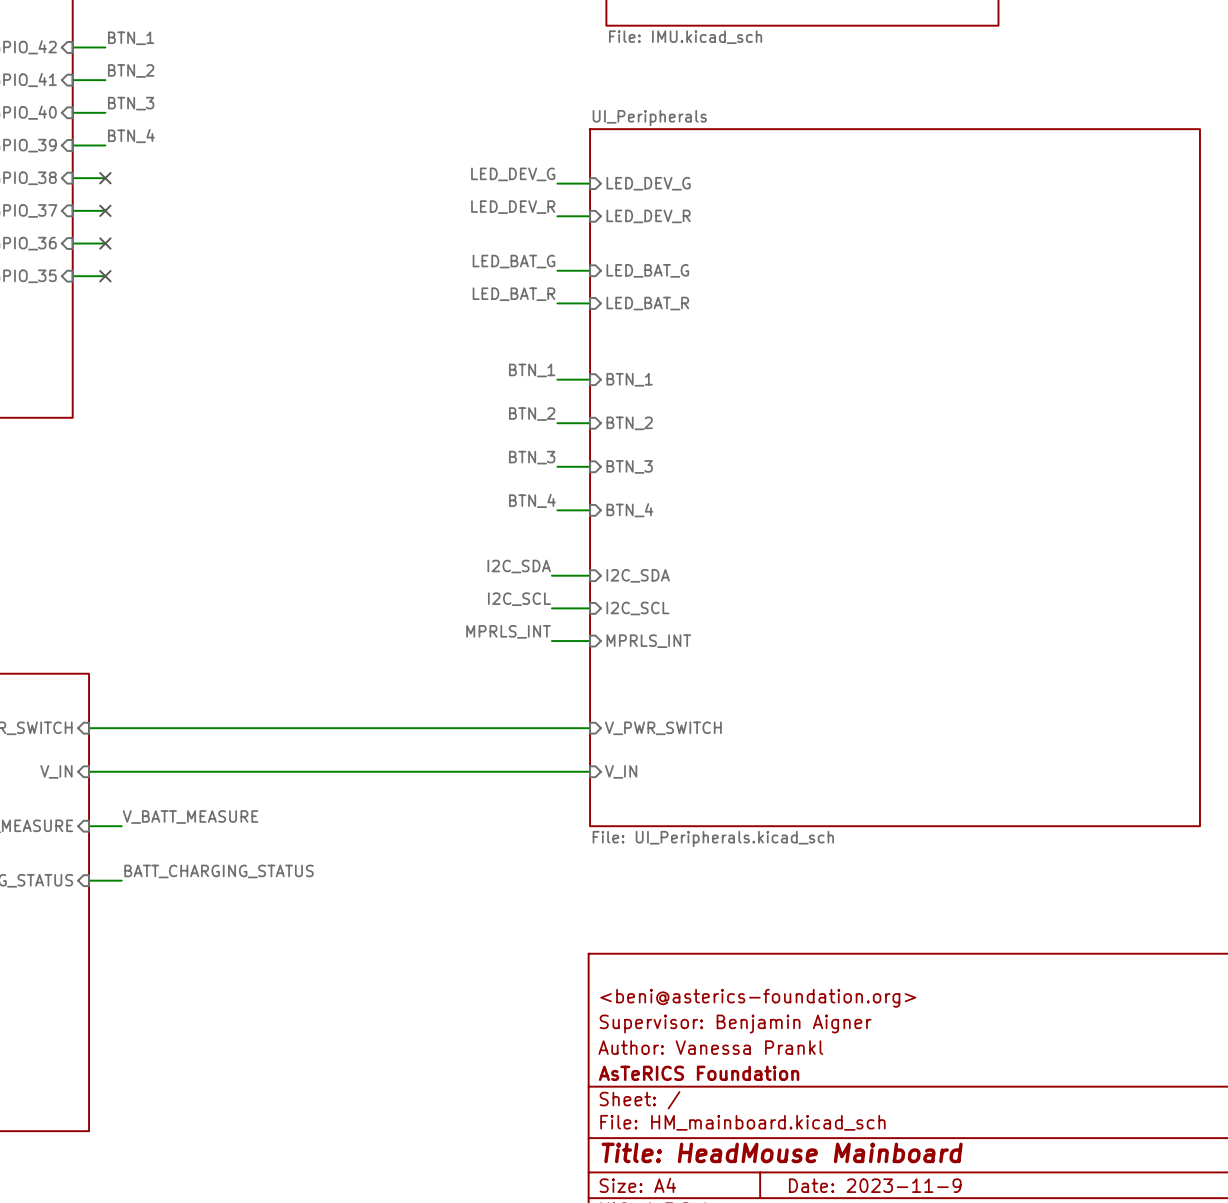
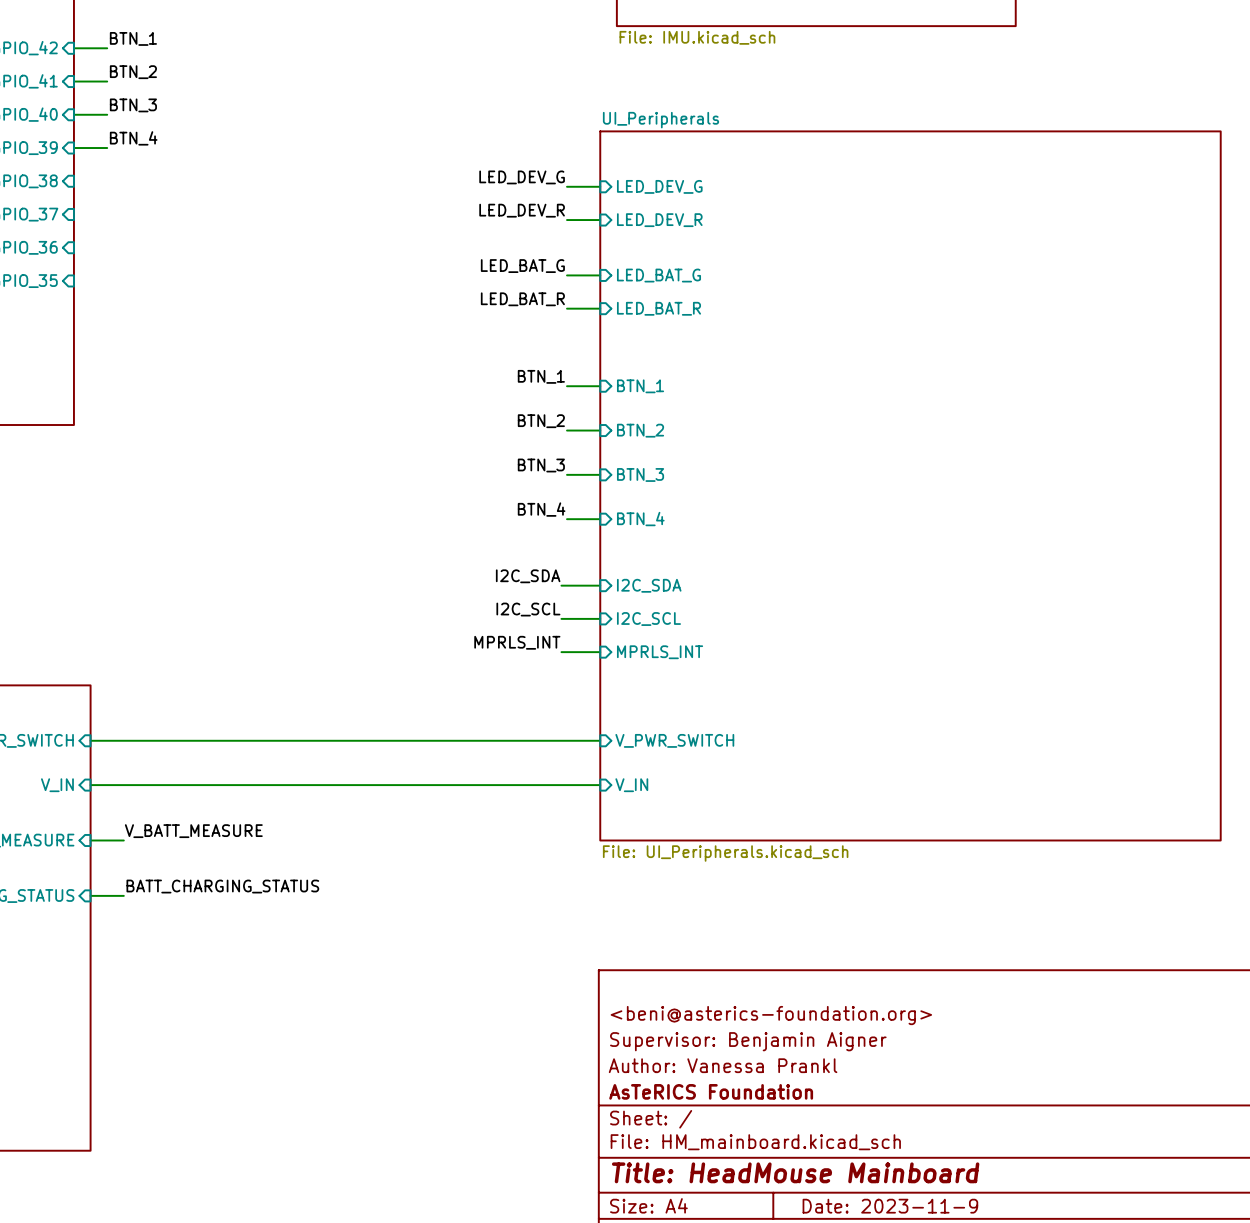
wire: (72, 178) (105, 178) -> none
no-connect mark: (105, 178) -> none
wire: (72, 210) (105, 210) -> none
no-connect mark: (105, 210) -> none
wire: (72, 243) (105, 243) -> none
no-connect mark: (105, 243) -> none
wire: (72, 276) (105, 276) -> none
no-connect mark: (105, 276) -> none

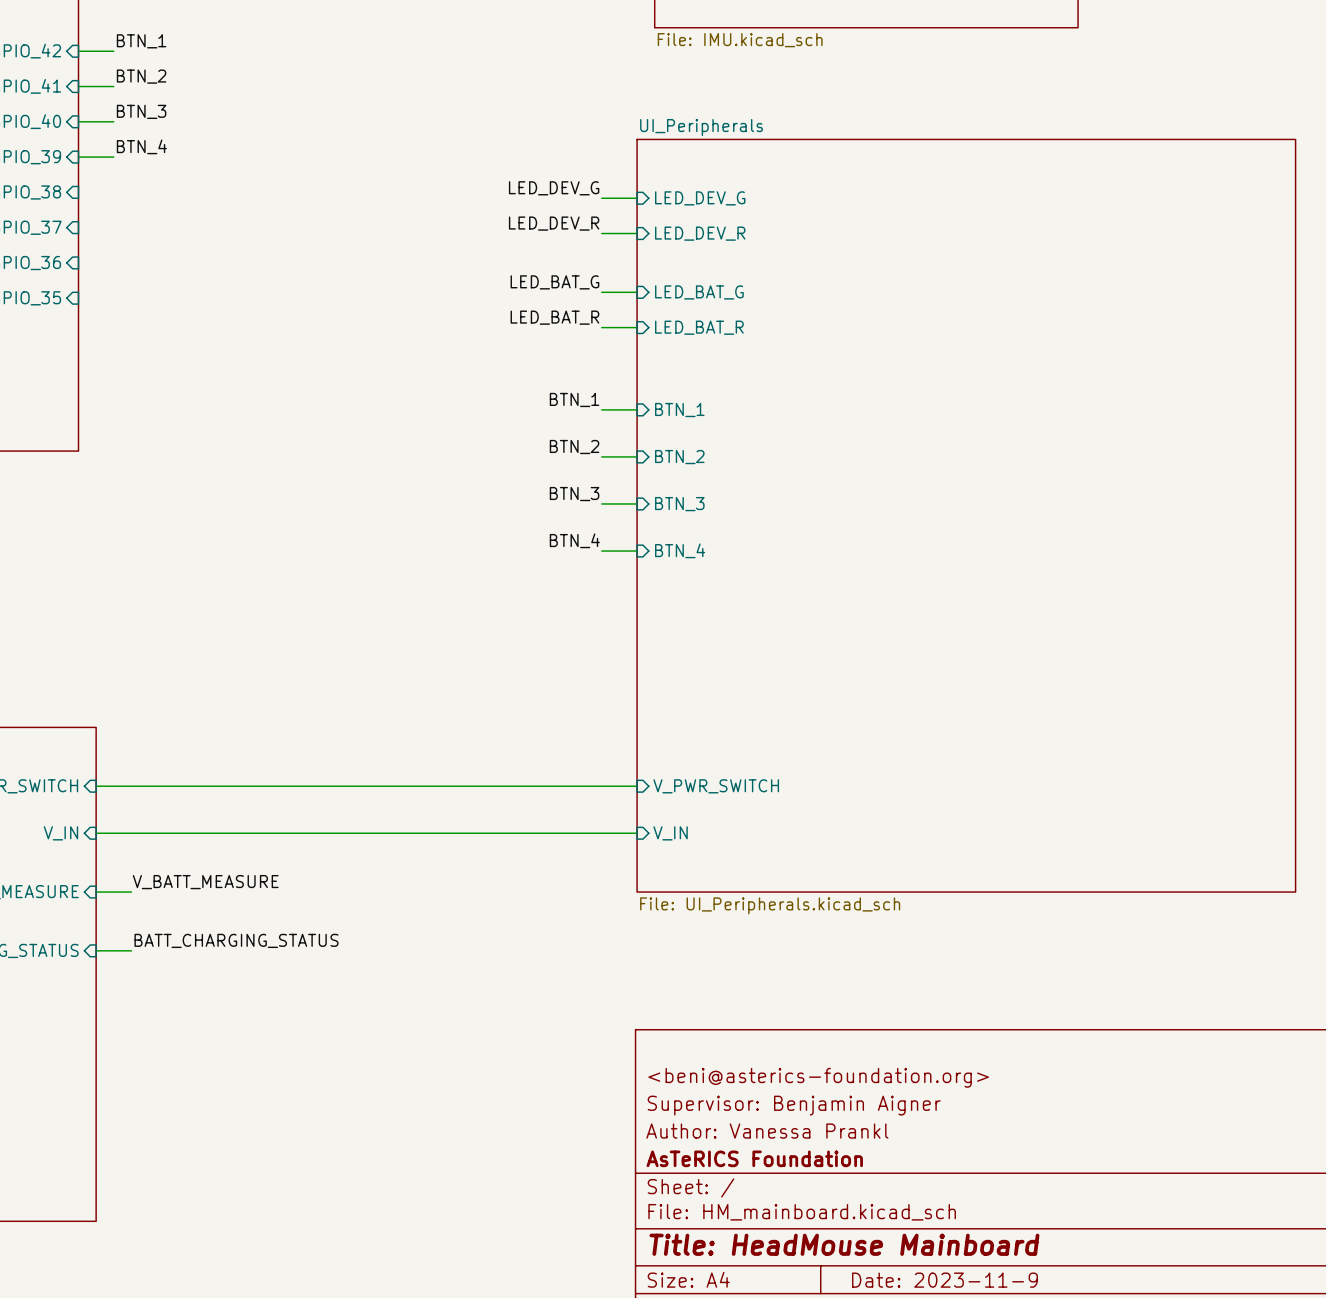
label: I2C_SDA (528, 576) -> none
wire: (561, 585) (600, 585) -> none
sheet pin: I2C_SDA (649, 585) -> none
label: I2C_SCL (528, 609) -> none
wire: (561, 618) (600, 618) -> none
sheet pin: I2C_SCL (648, 619) -> none
label: MPRLS_INT (517, 642) -> none
wire: (561, 652) (600, 652) -> none
sheet pin: MPRLS_INT (660, 652) -> none

